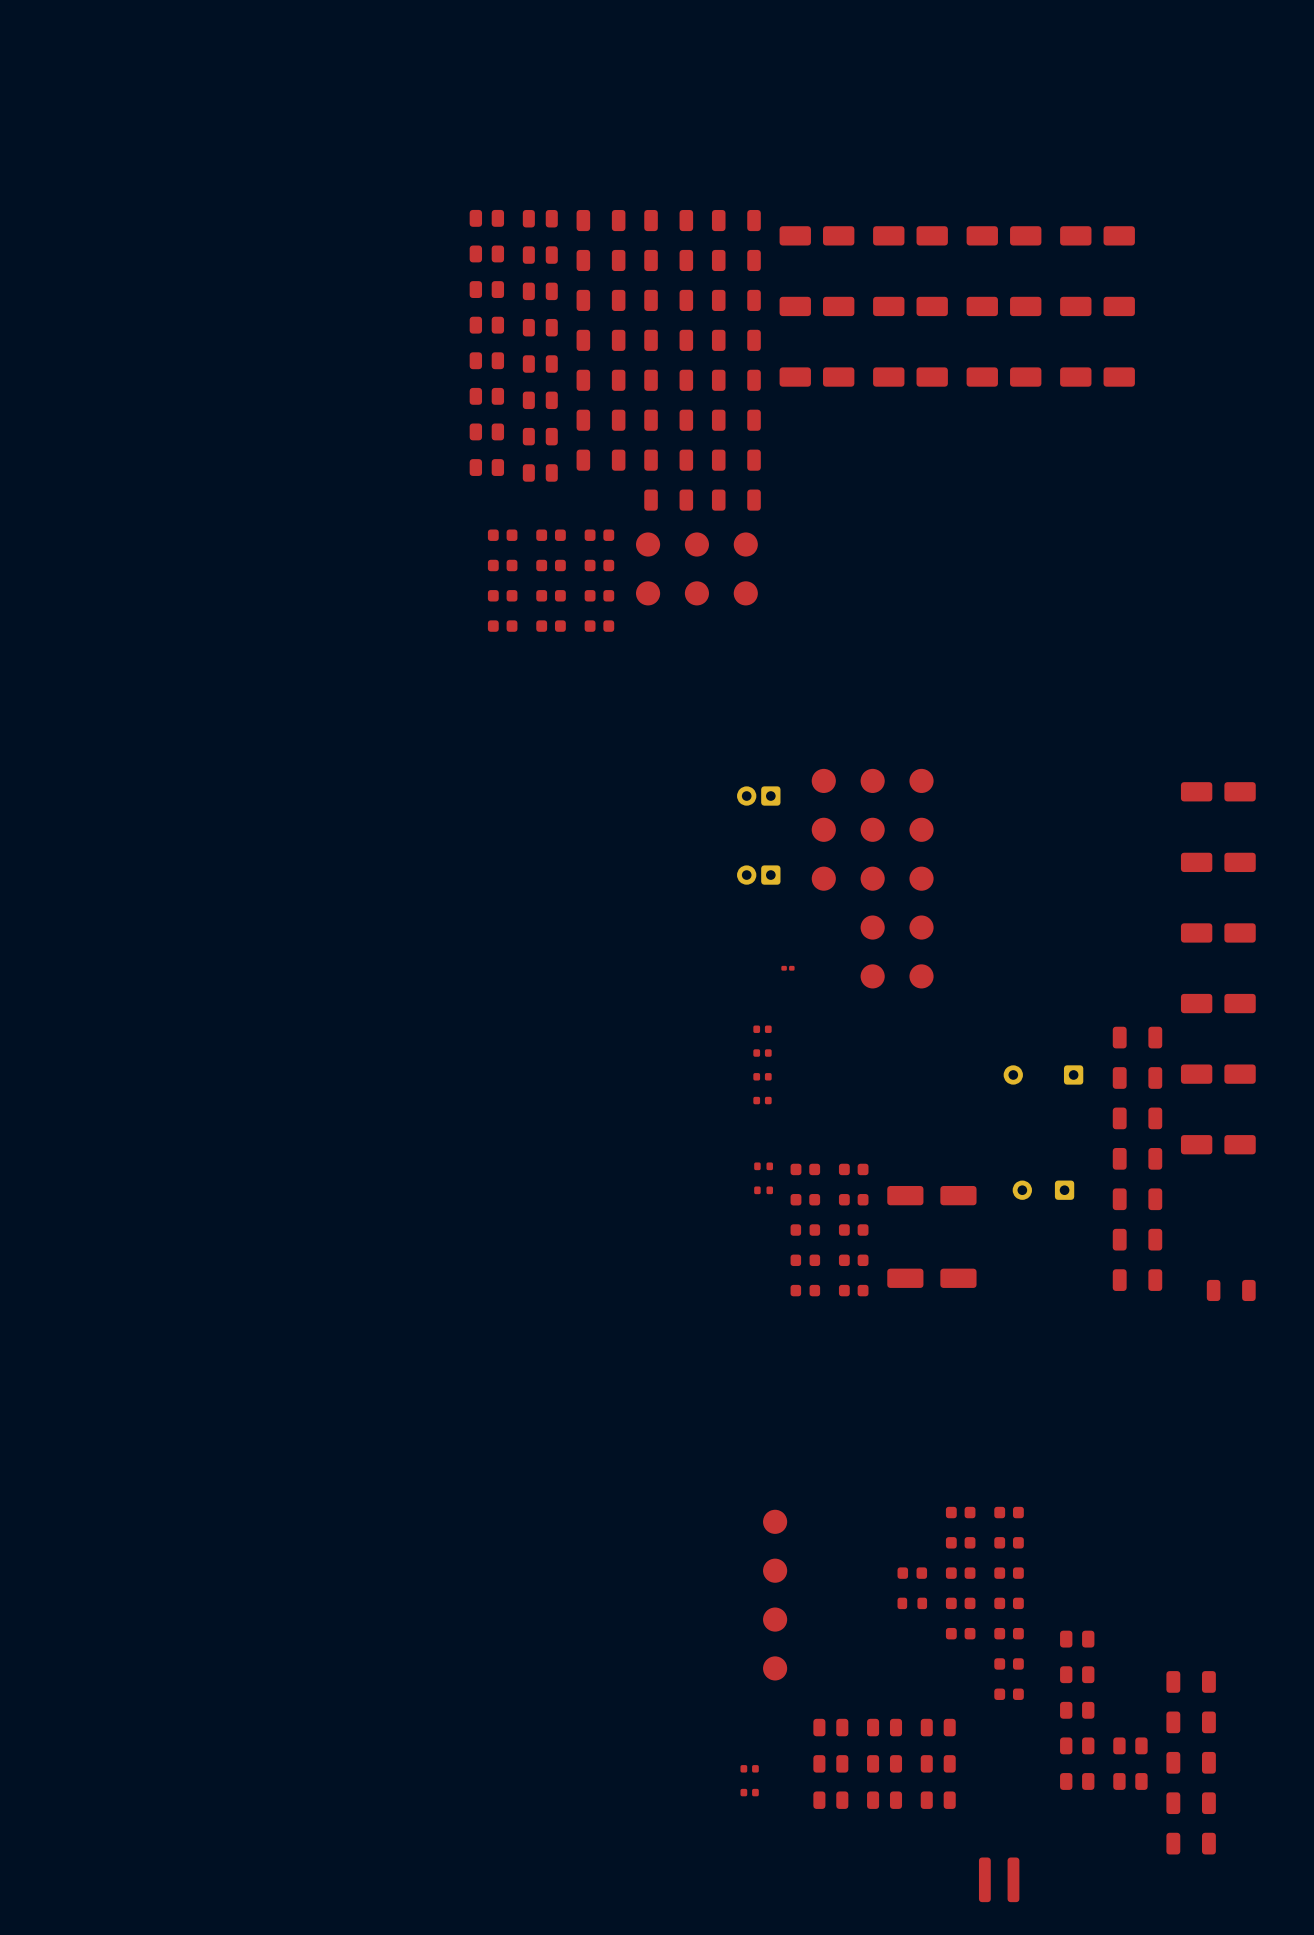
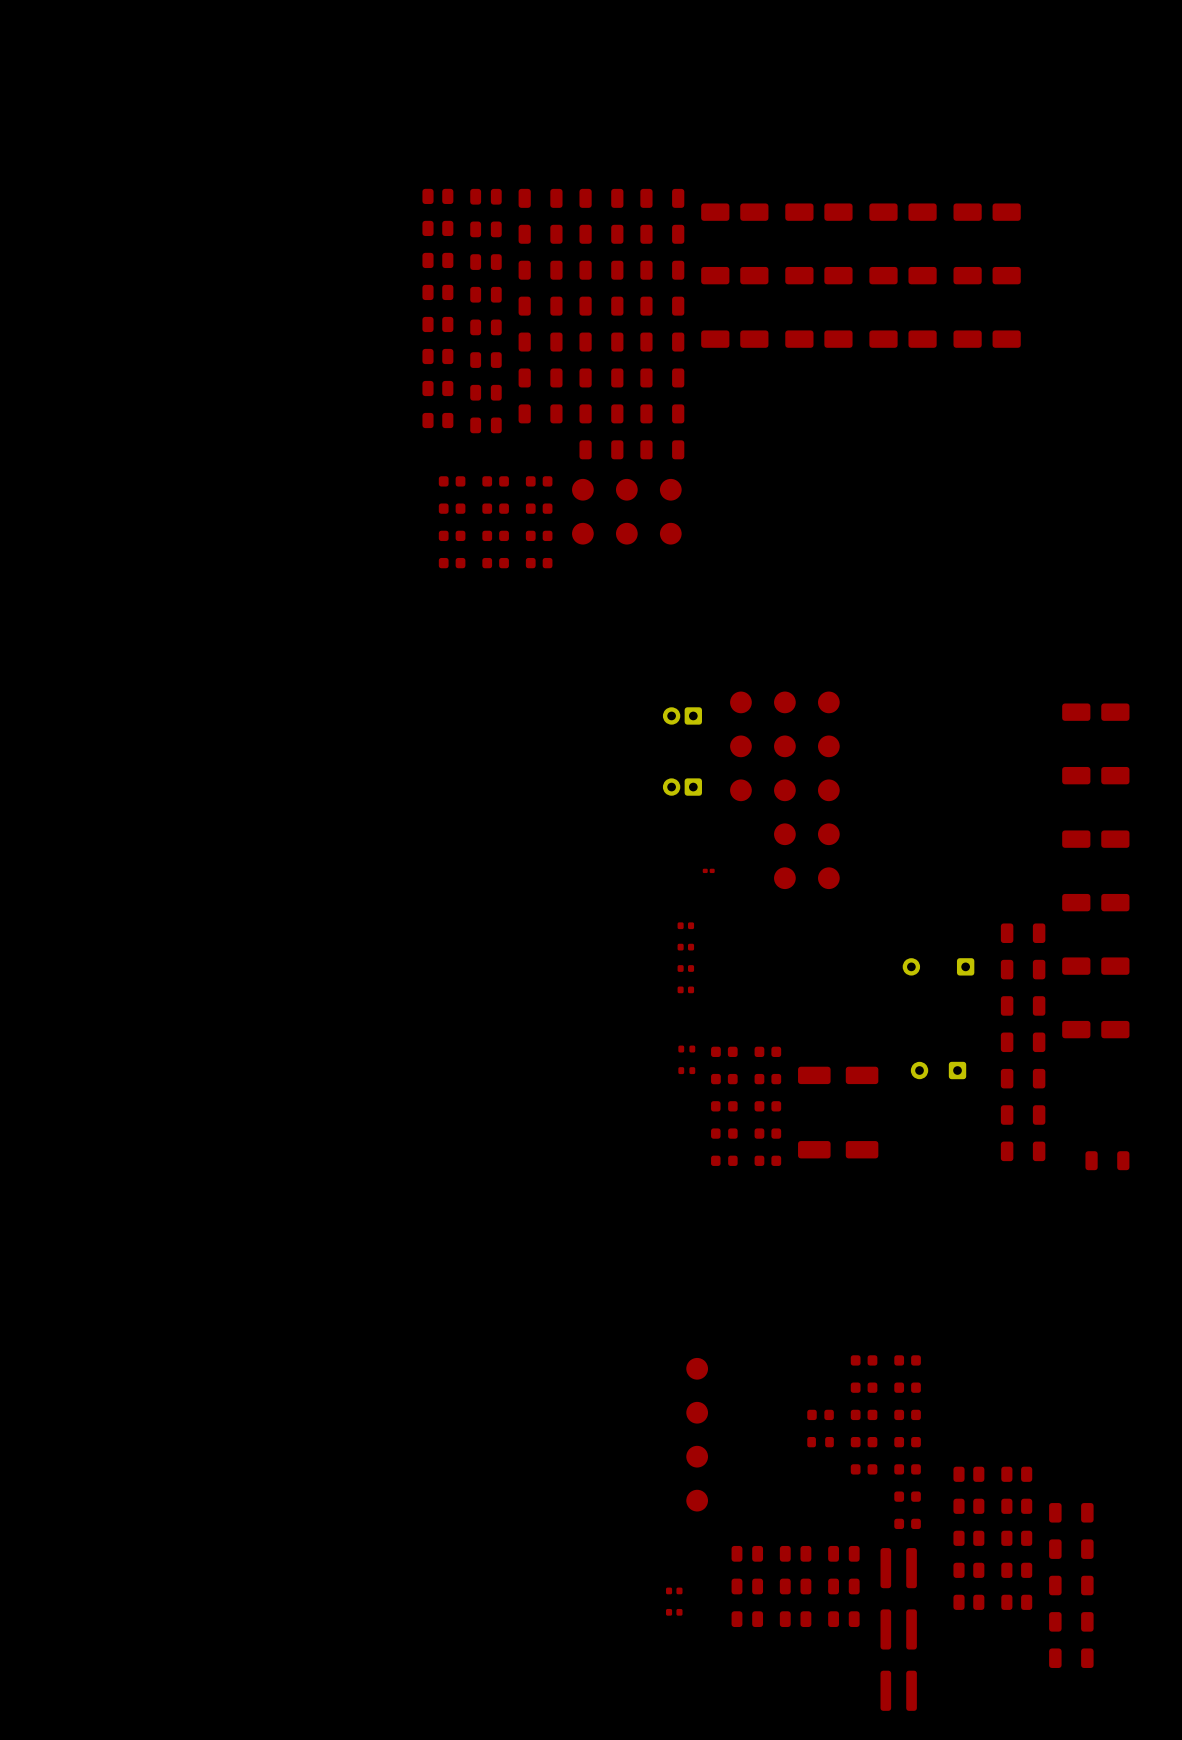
part: none -> (1016, 1474)
part: none -> (1016, 1506)
part: none -> (1016, 1538)
part: none -> (898, 1568)
part: none -> (898, 1629)

